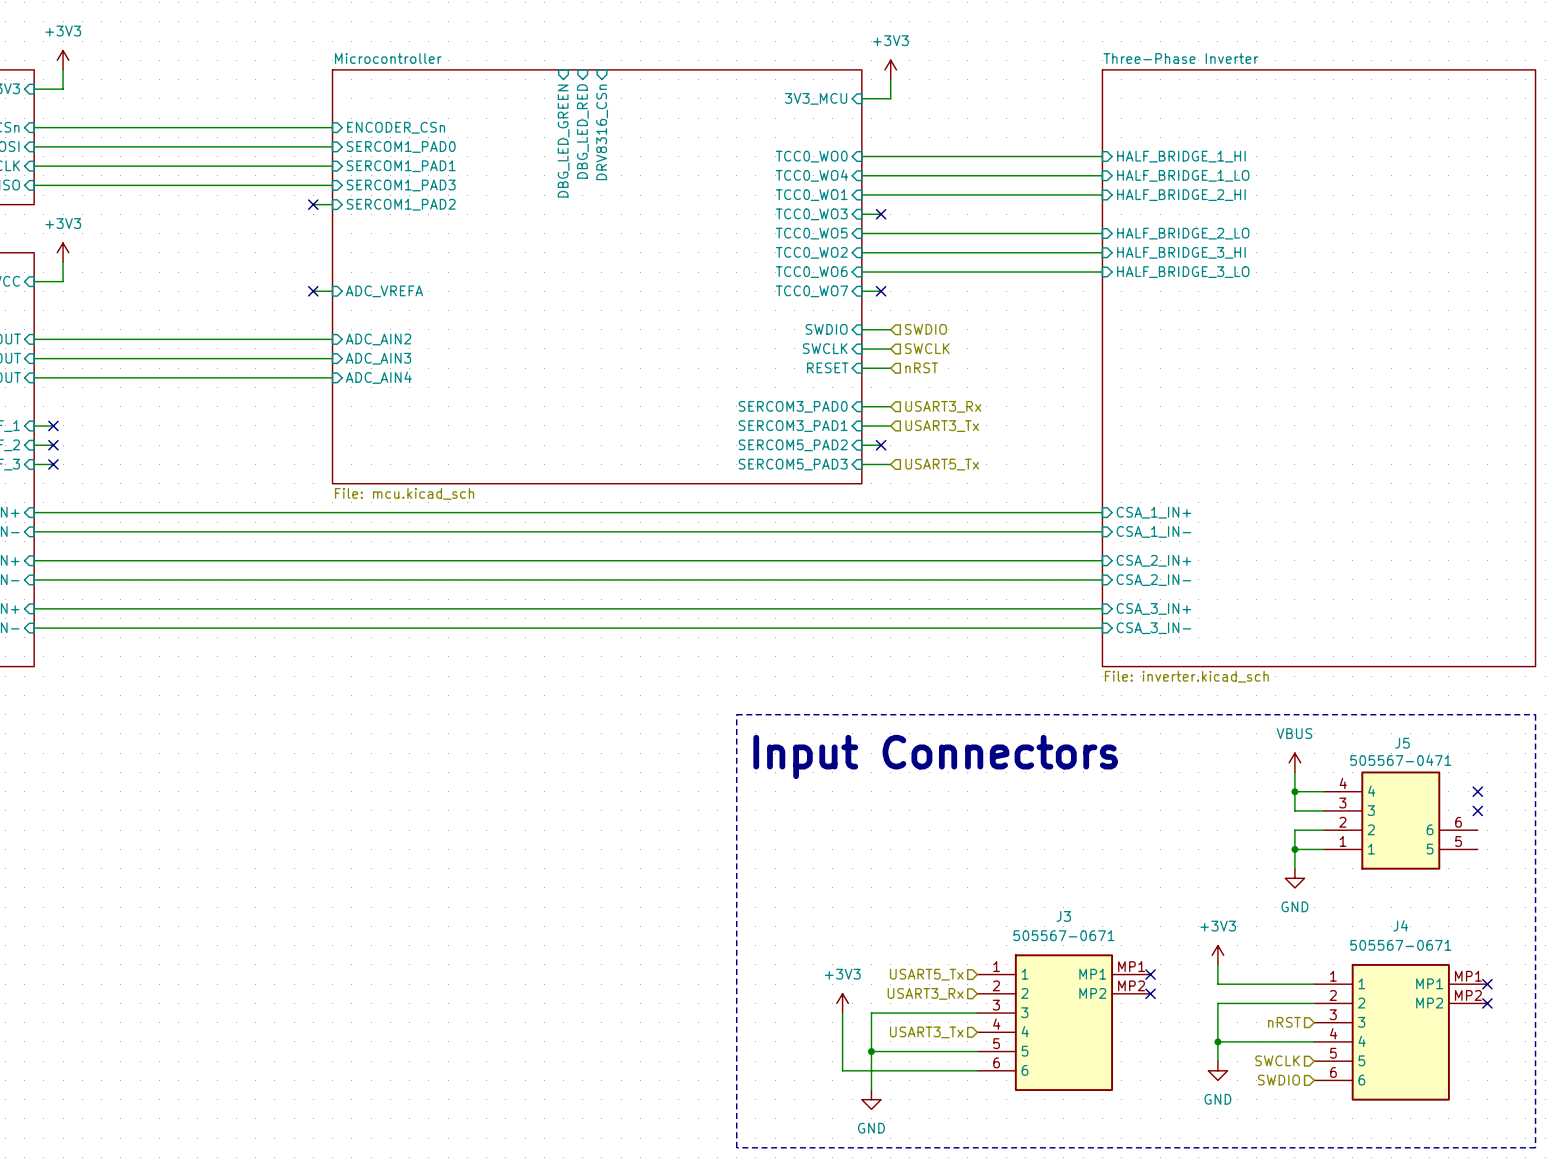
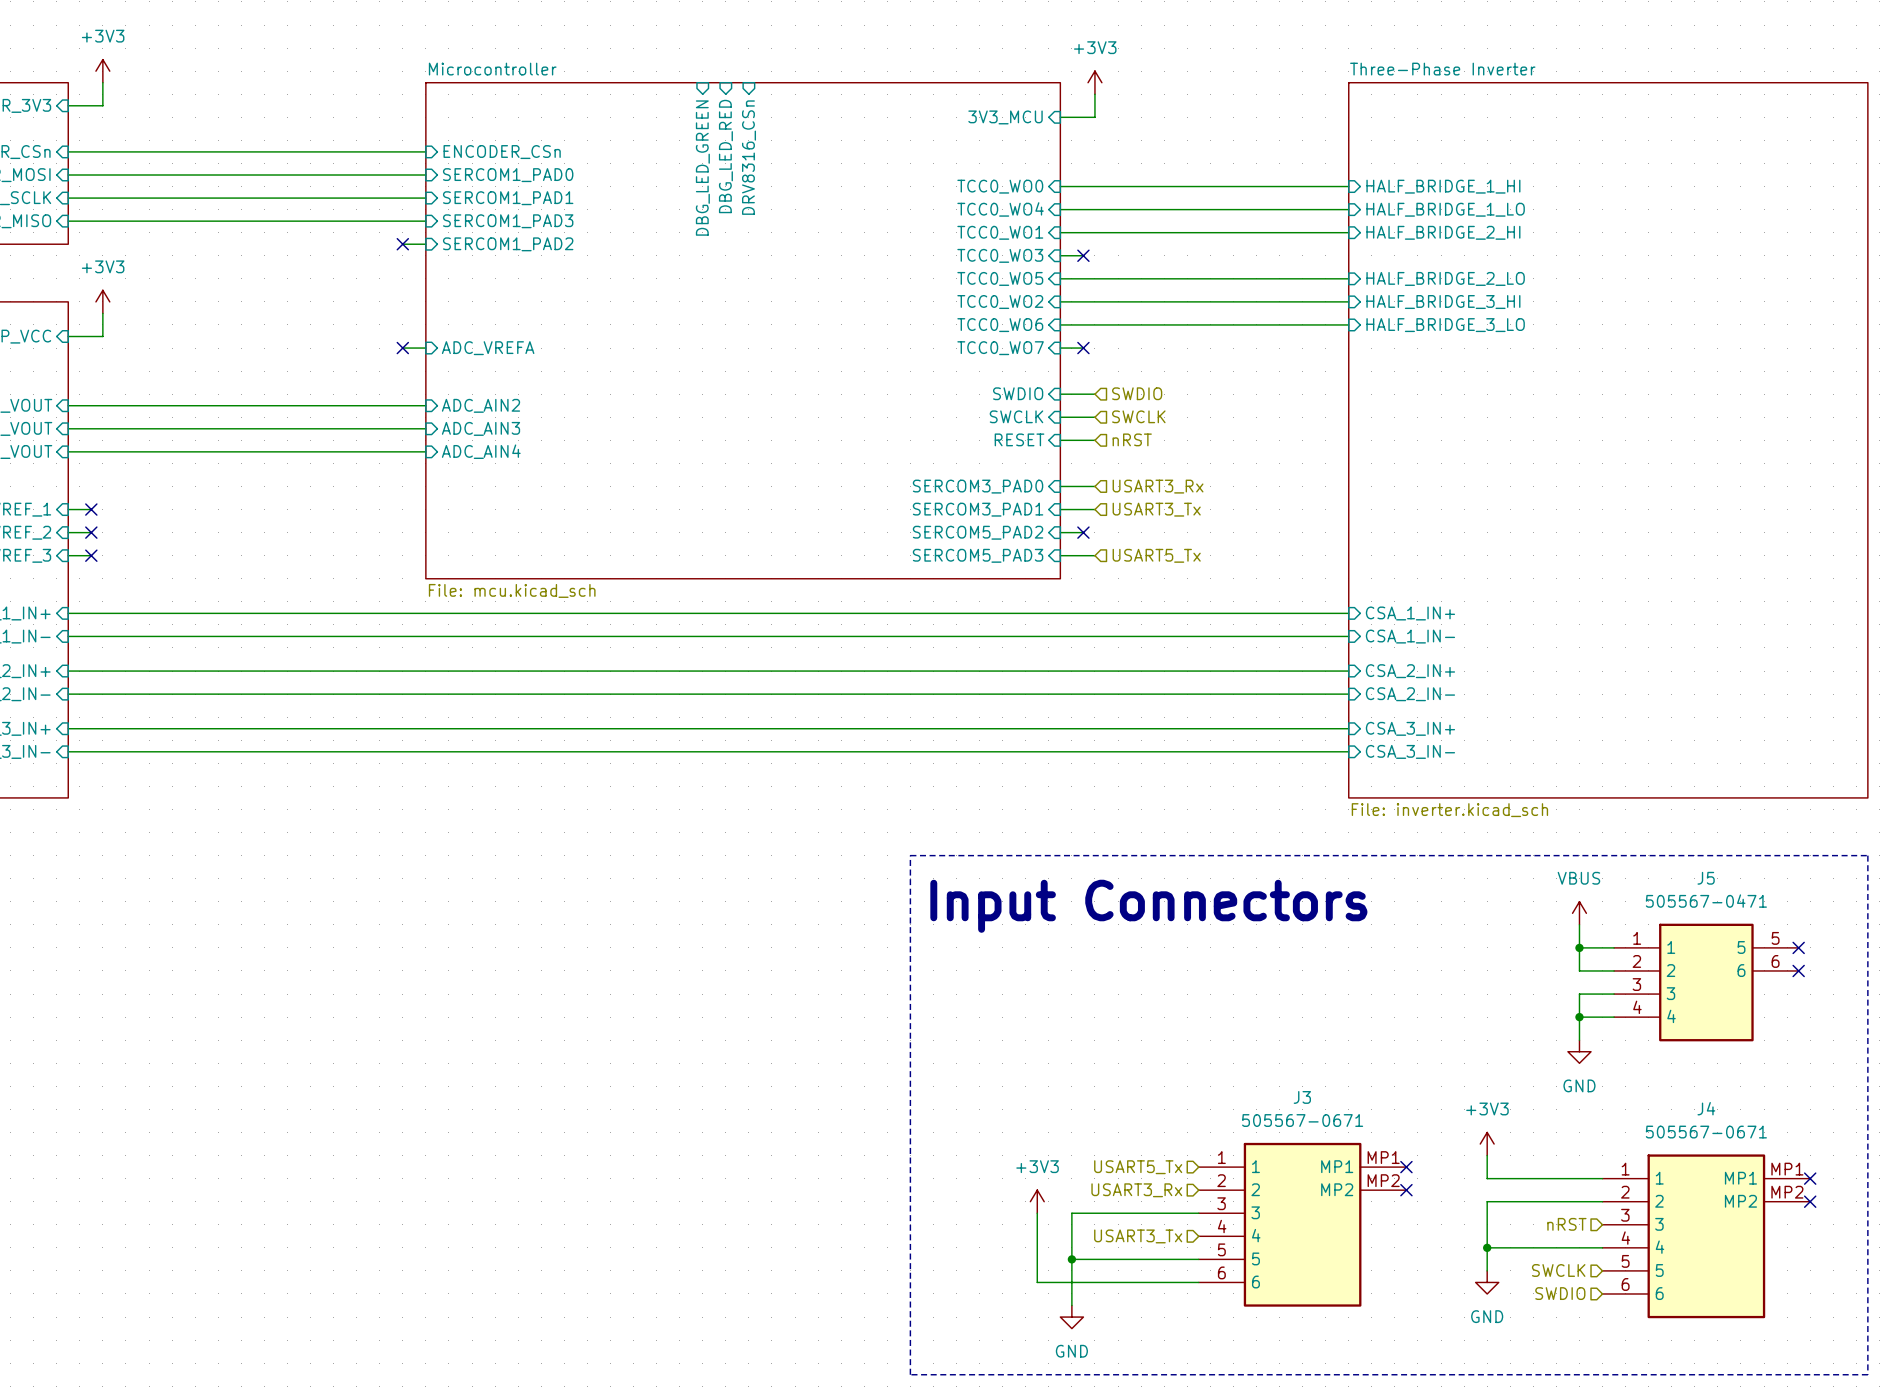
J5 flip: as is (1400, 820) -> up-down (1706, 982)

